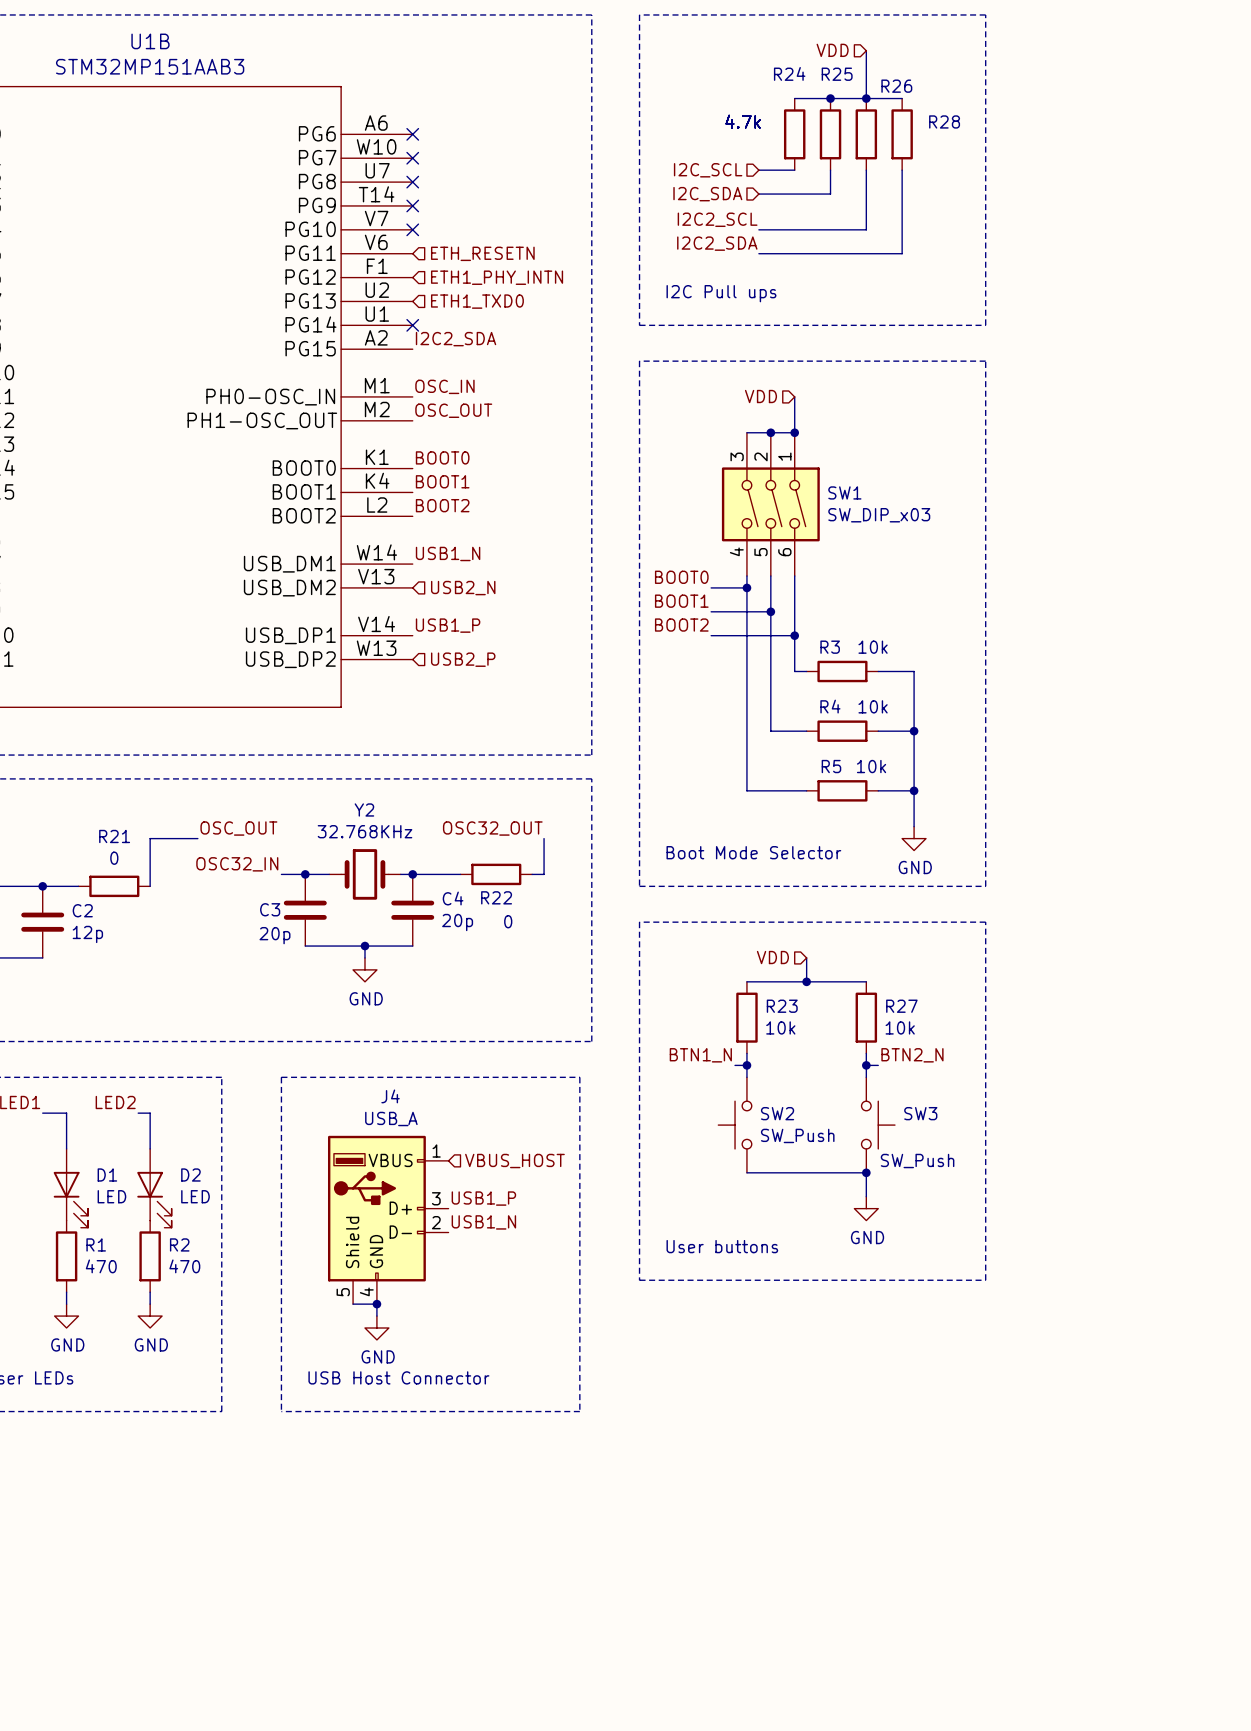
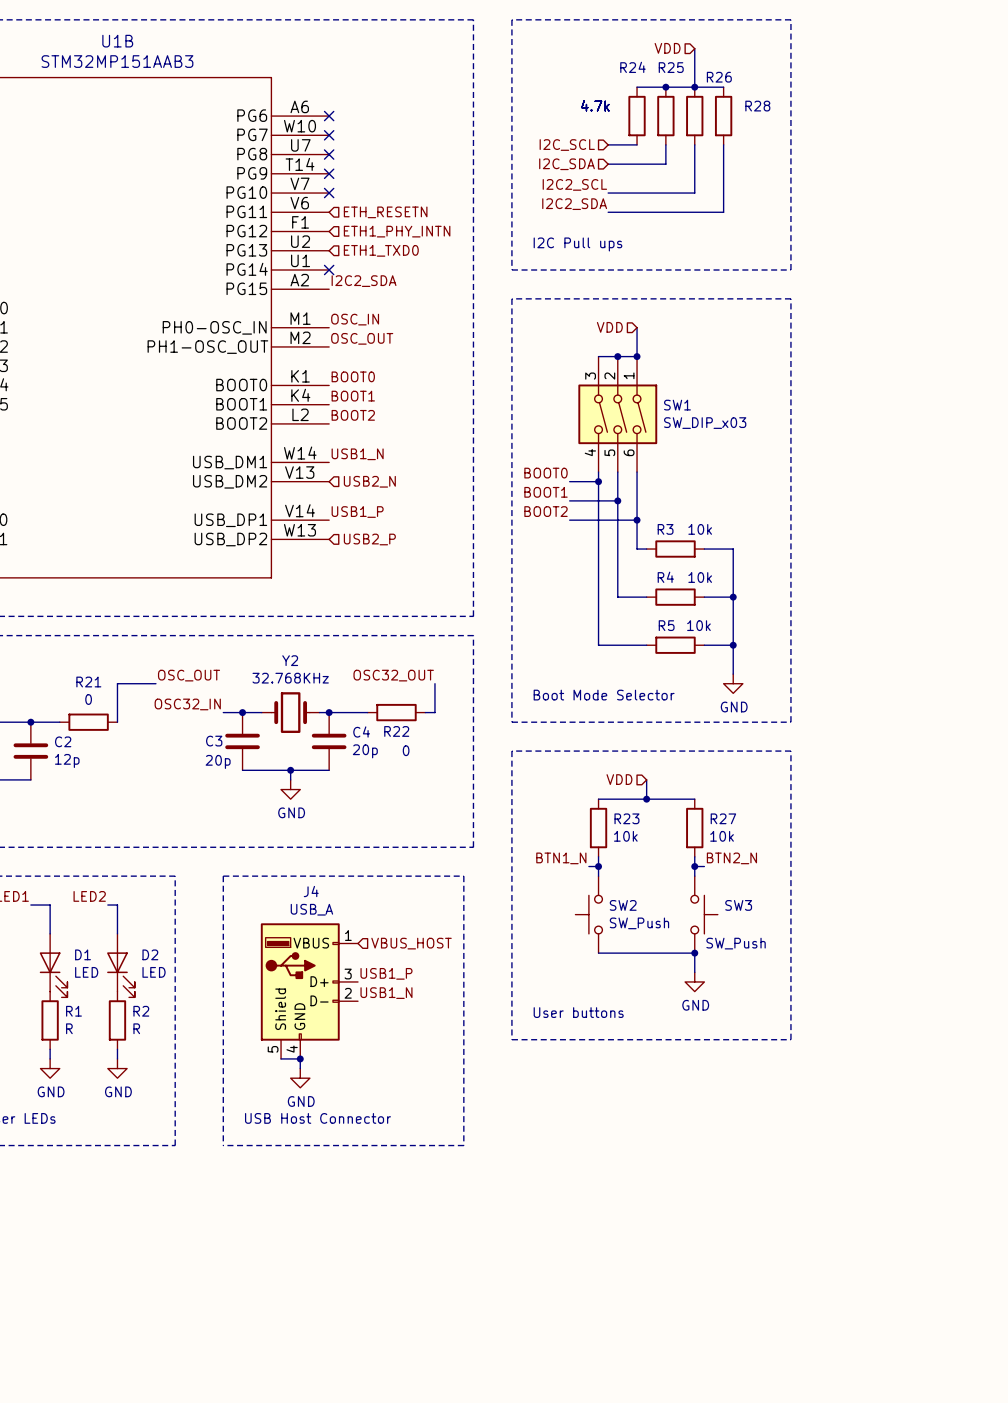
R1 value: 470 (101, 1266) -> R (69, 1028)
R2 value: 470 (184, 1266) -> R (136, 1028)

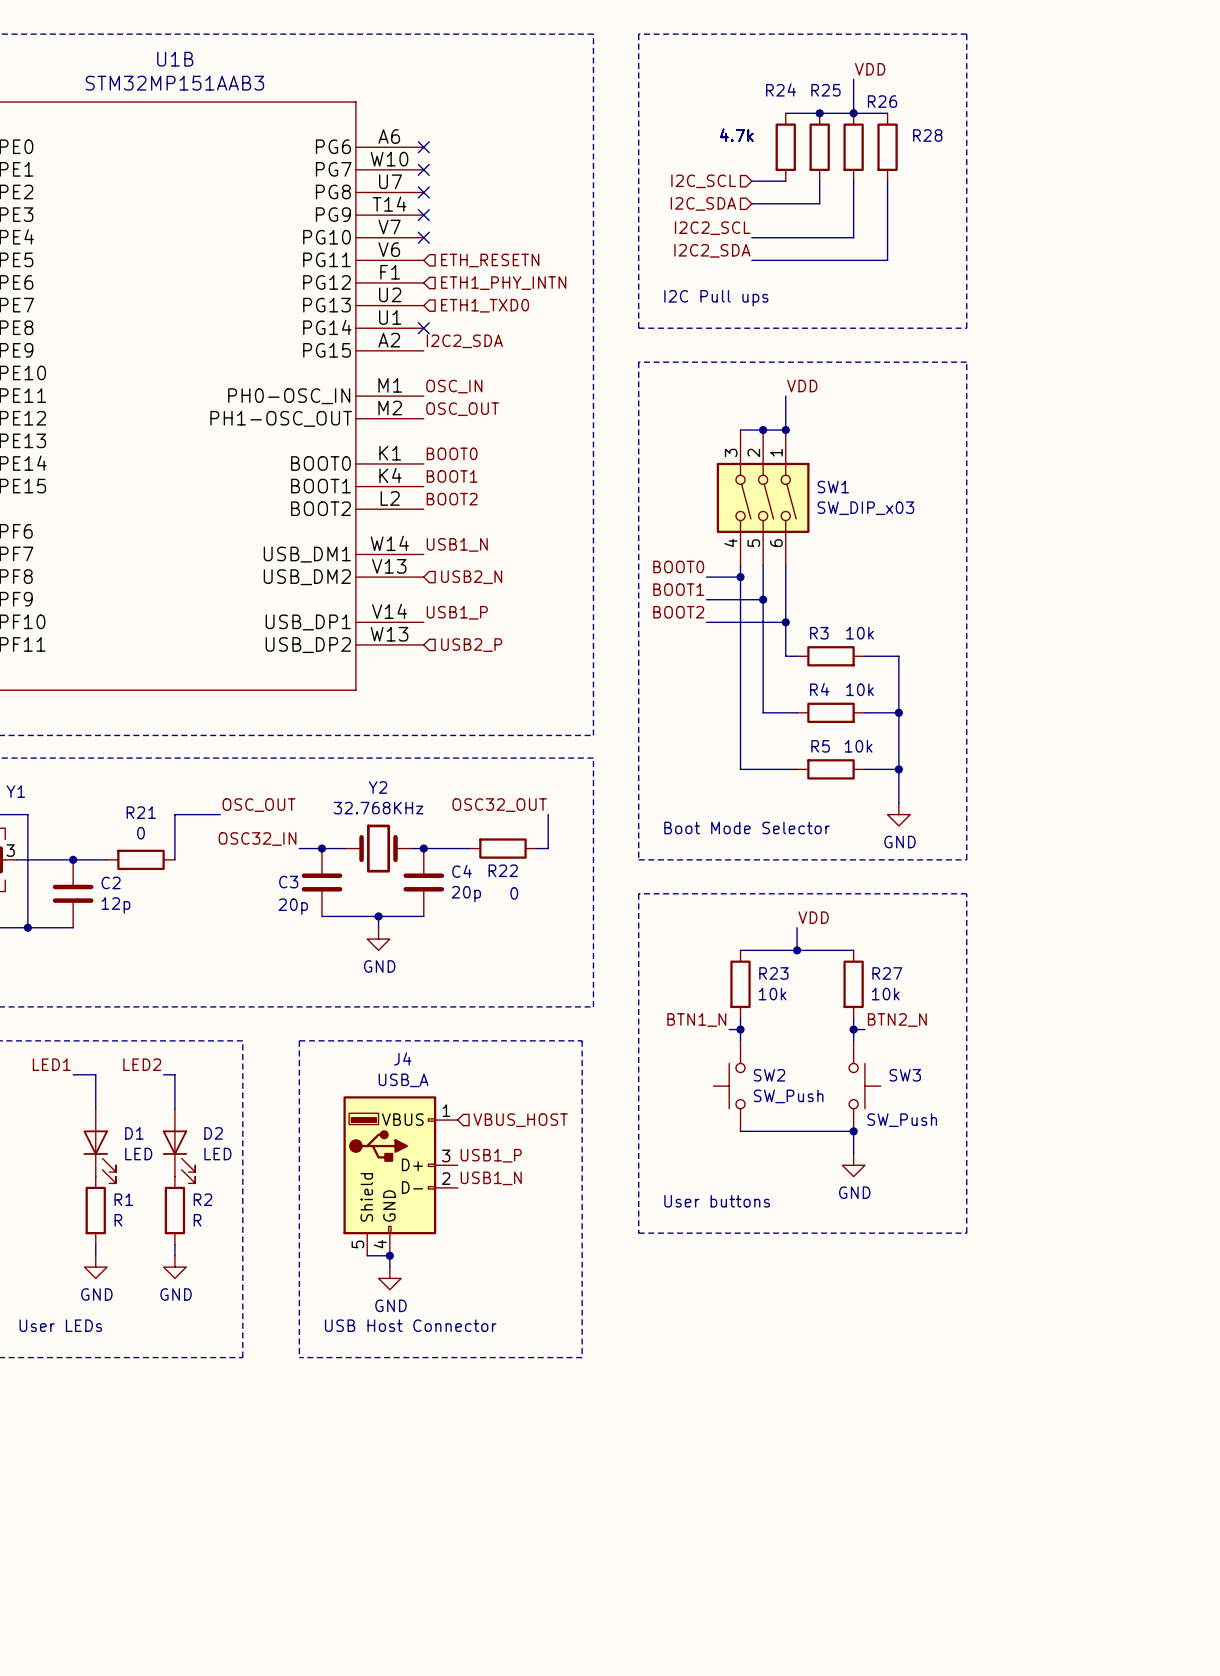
hierarchical label: VDD (667, 48) -> none
wire: (694, 48) (694, 58) -> none
label: none -> VDD (870, 69)
label: none -> VDD (802, 386)
hierarchical label: VDD (609, 327) -> none
label: none -> VDD (813, 917)
hierarchical label: VDD (619, 779) -> none

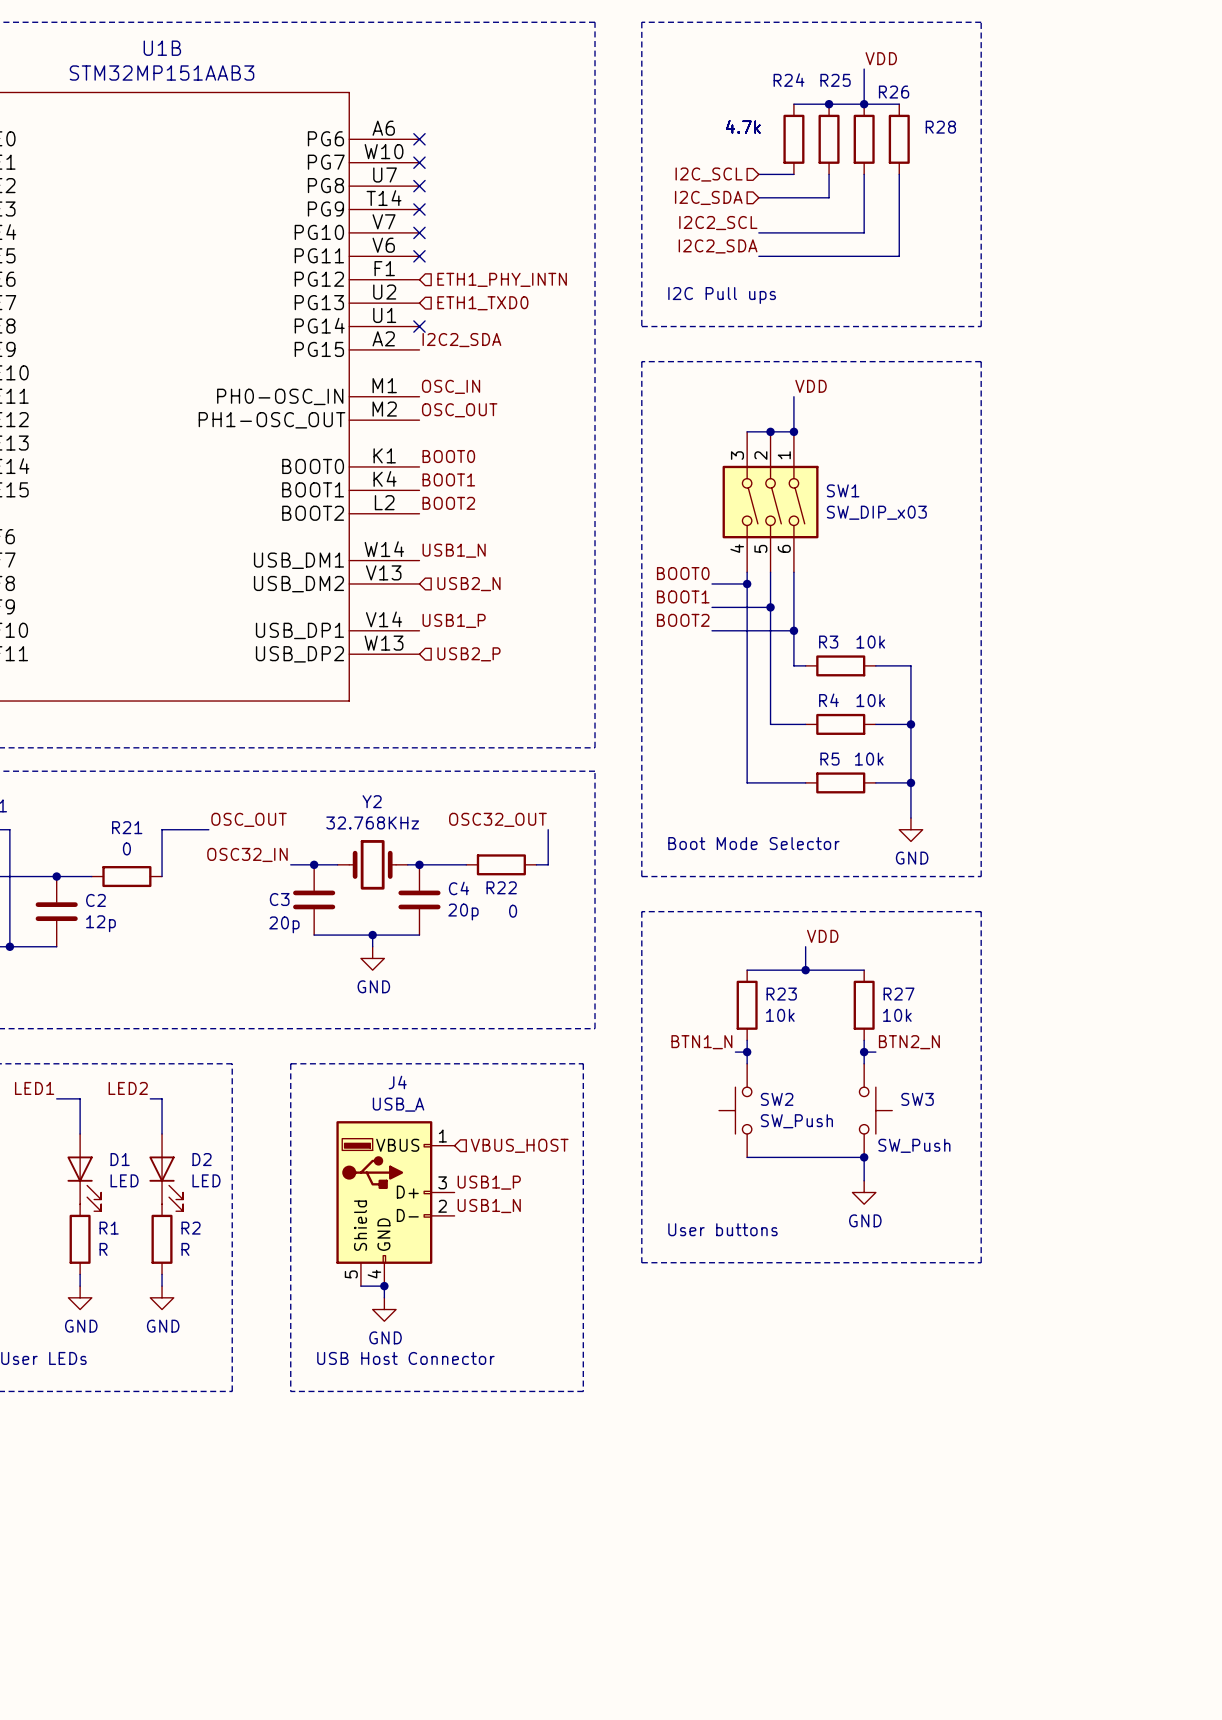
no-connect mark: none -> (419, 256)
hierarchical label: ETH_RESETN (490, 260) -> none

